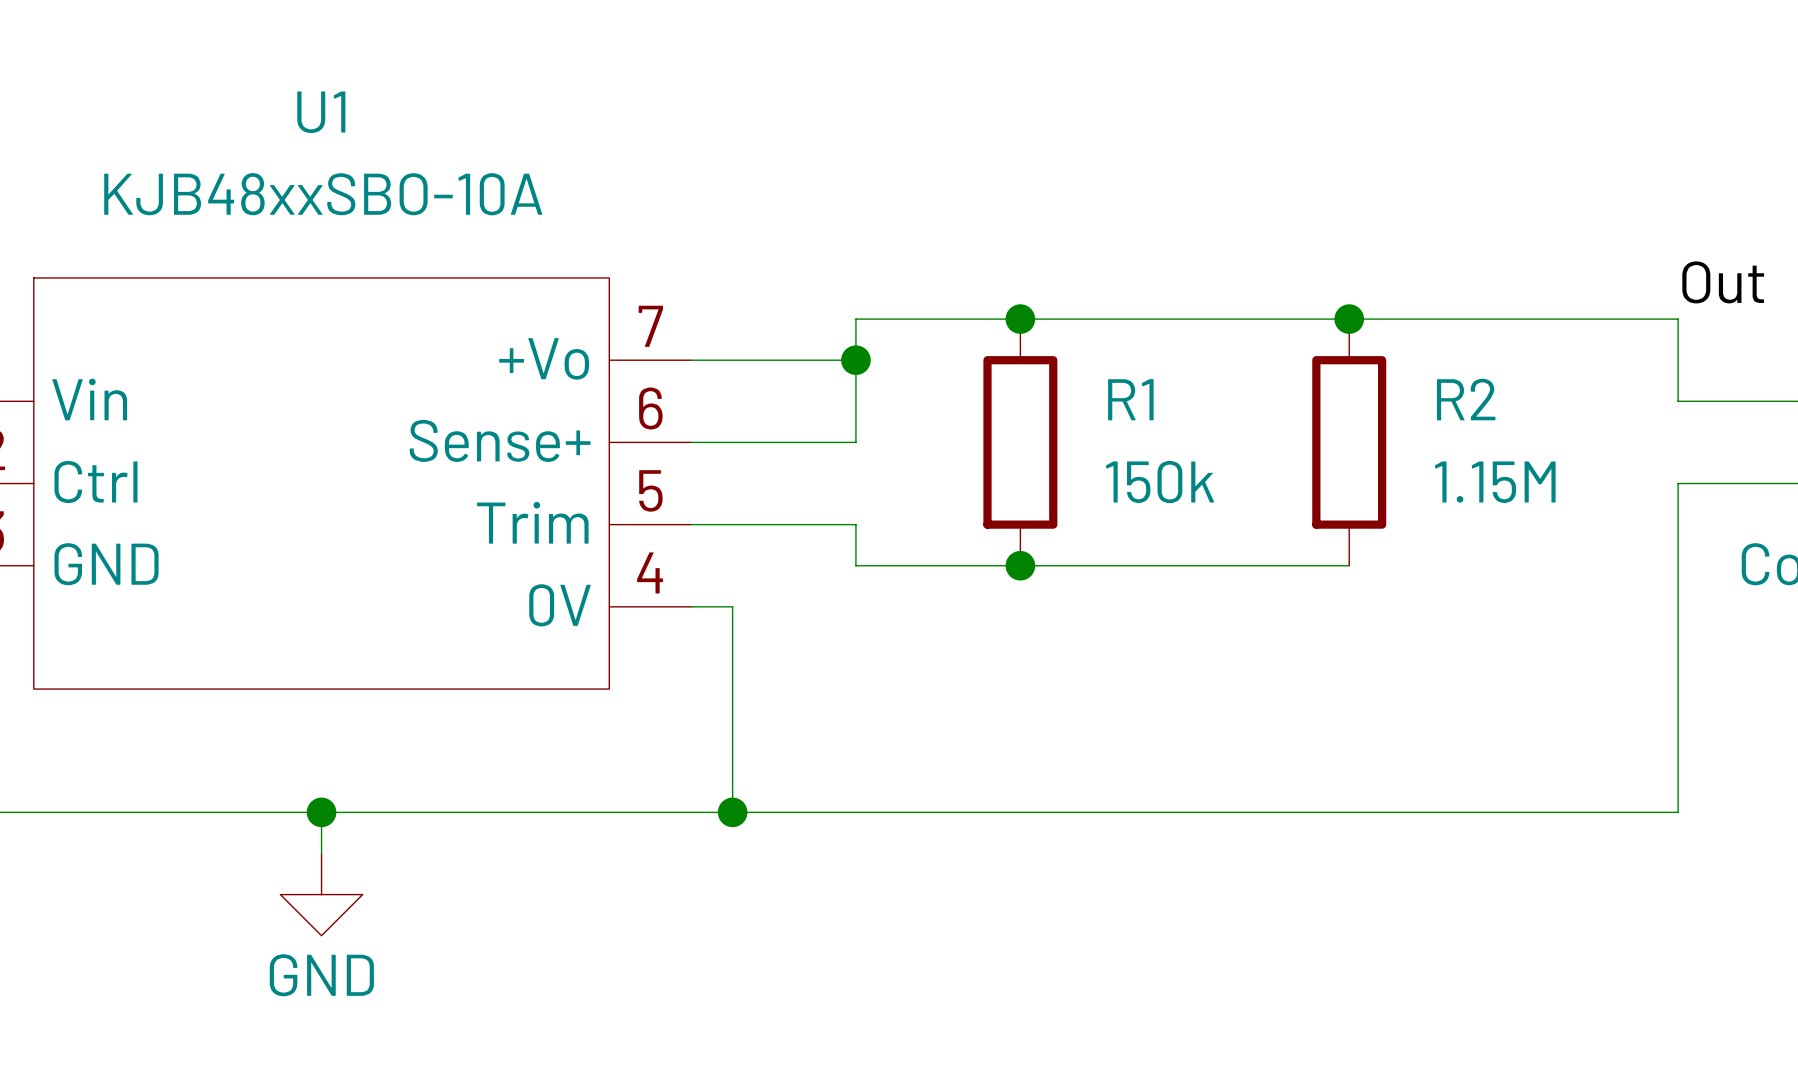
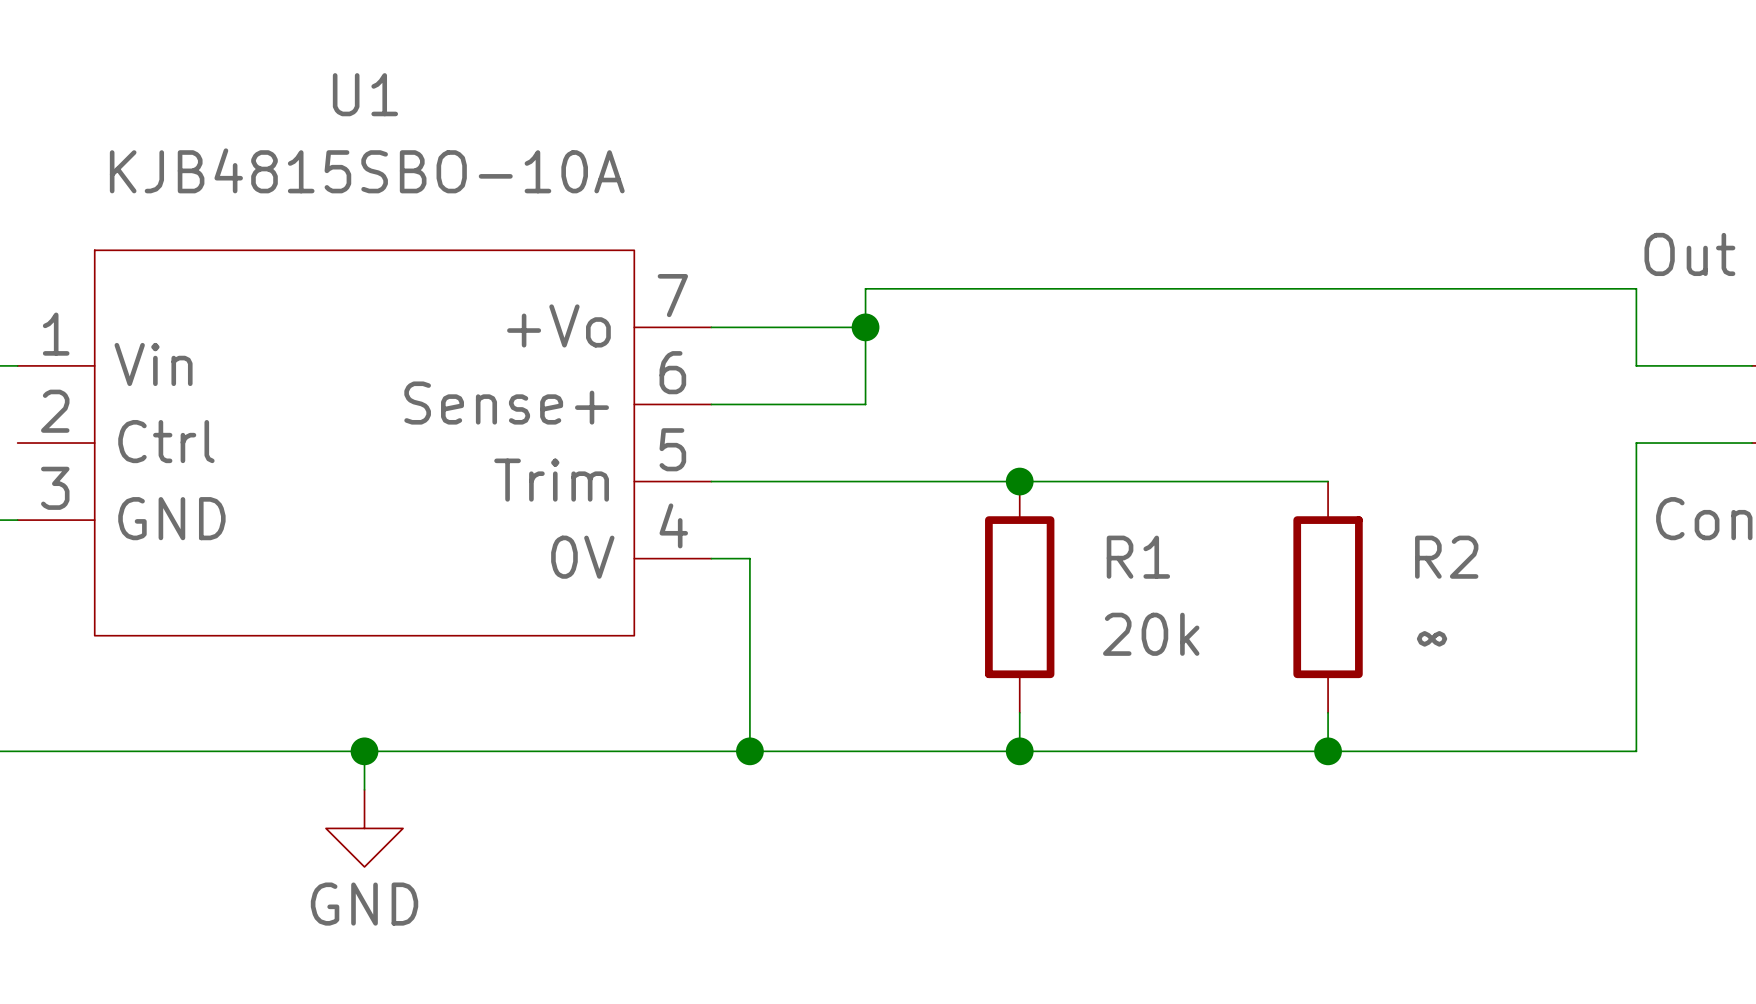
U1 value: KJB48xxSBO-10A (323, 194) -> KJB4815SBO-10A (367, 170)
junction: (1020, 319) -> none
junction: (1349, 319) -> none
R1 position: (1020, 442) -> (1019, 597)
R2 position: (1349, 442) -> (1328, 597)
R1 value: 150k (1160, 482) -> 20k (1151, 634)
R2 value: 1.15M (1495, 482) -> ∞ (1432, 638)
wire: (855, 524) (855, 565) (1349, 565) -> (865, 481) (1328, 481)
junction position: (1020, 565) -> (1019, 481)
wire: none -> (1019, 712) (1019, 751)
wire: none -> (1328, 712) (1328, 751)
junction: none -> (1019, 751)
junction: none -> (1328, 751)

